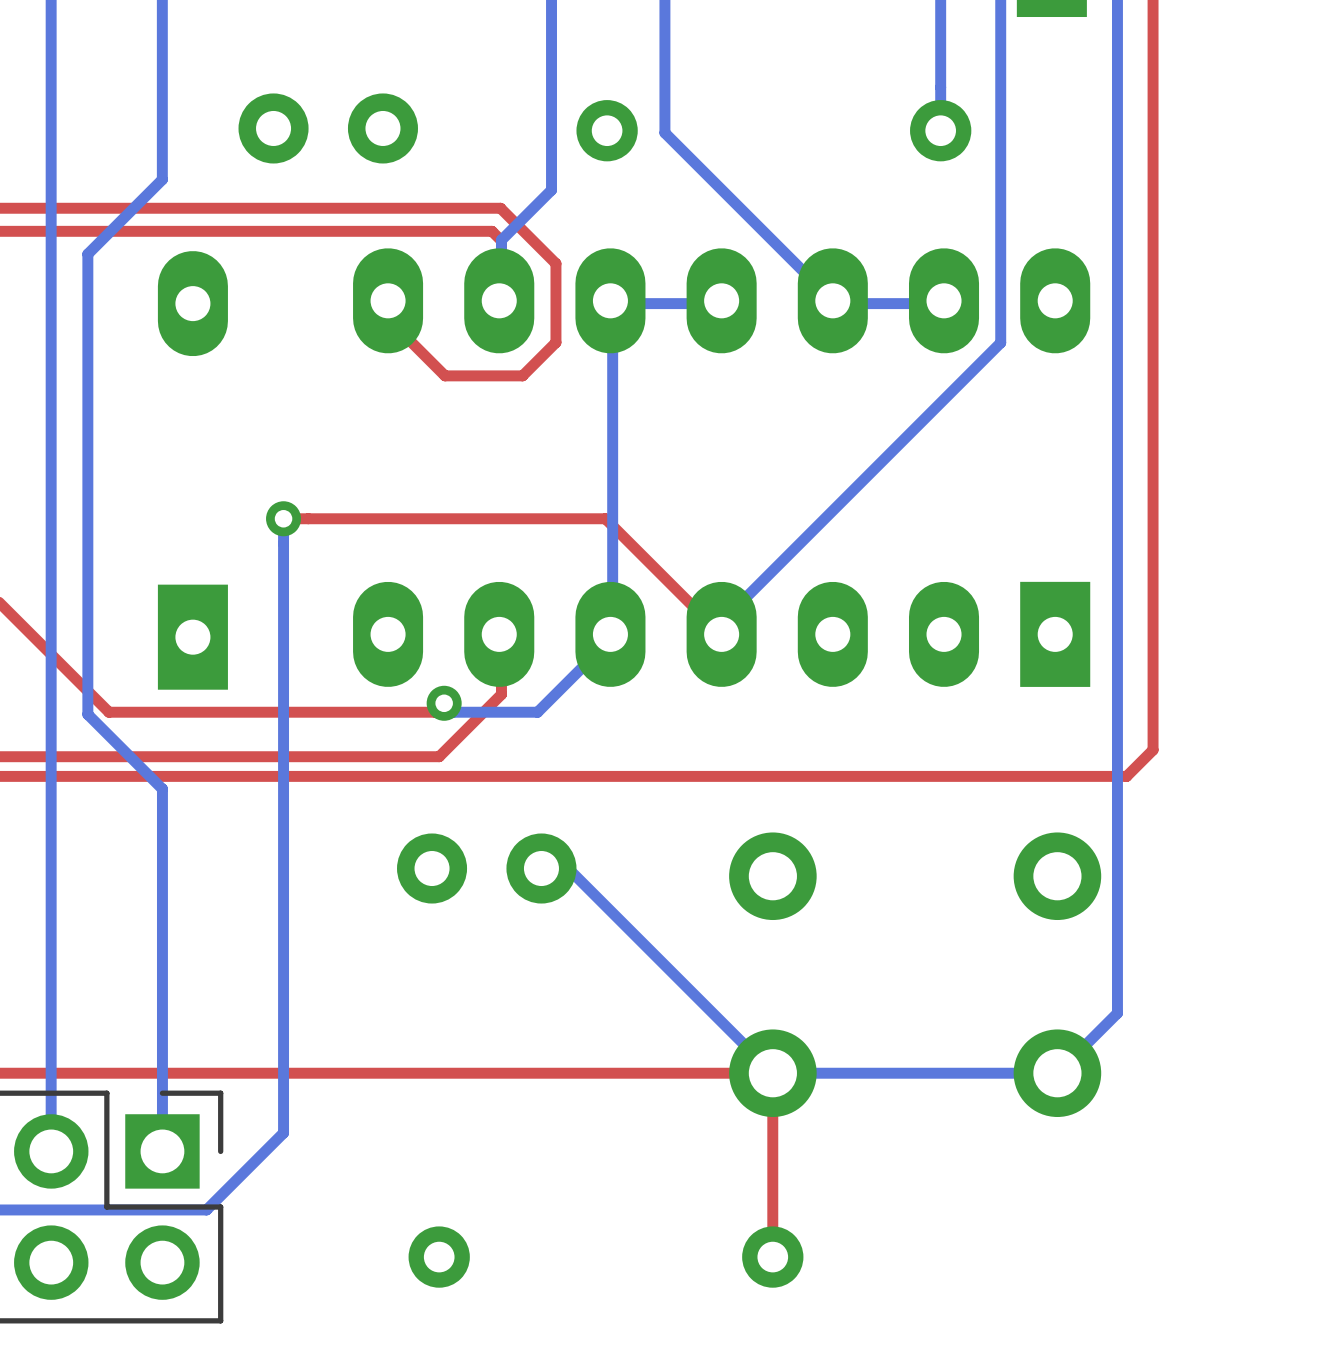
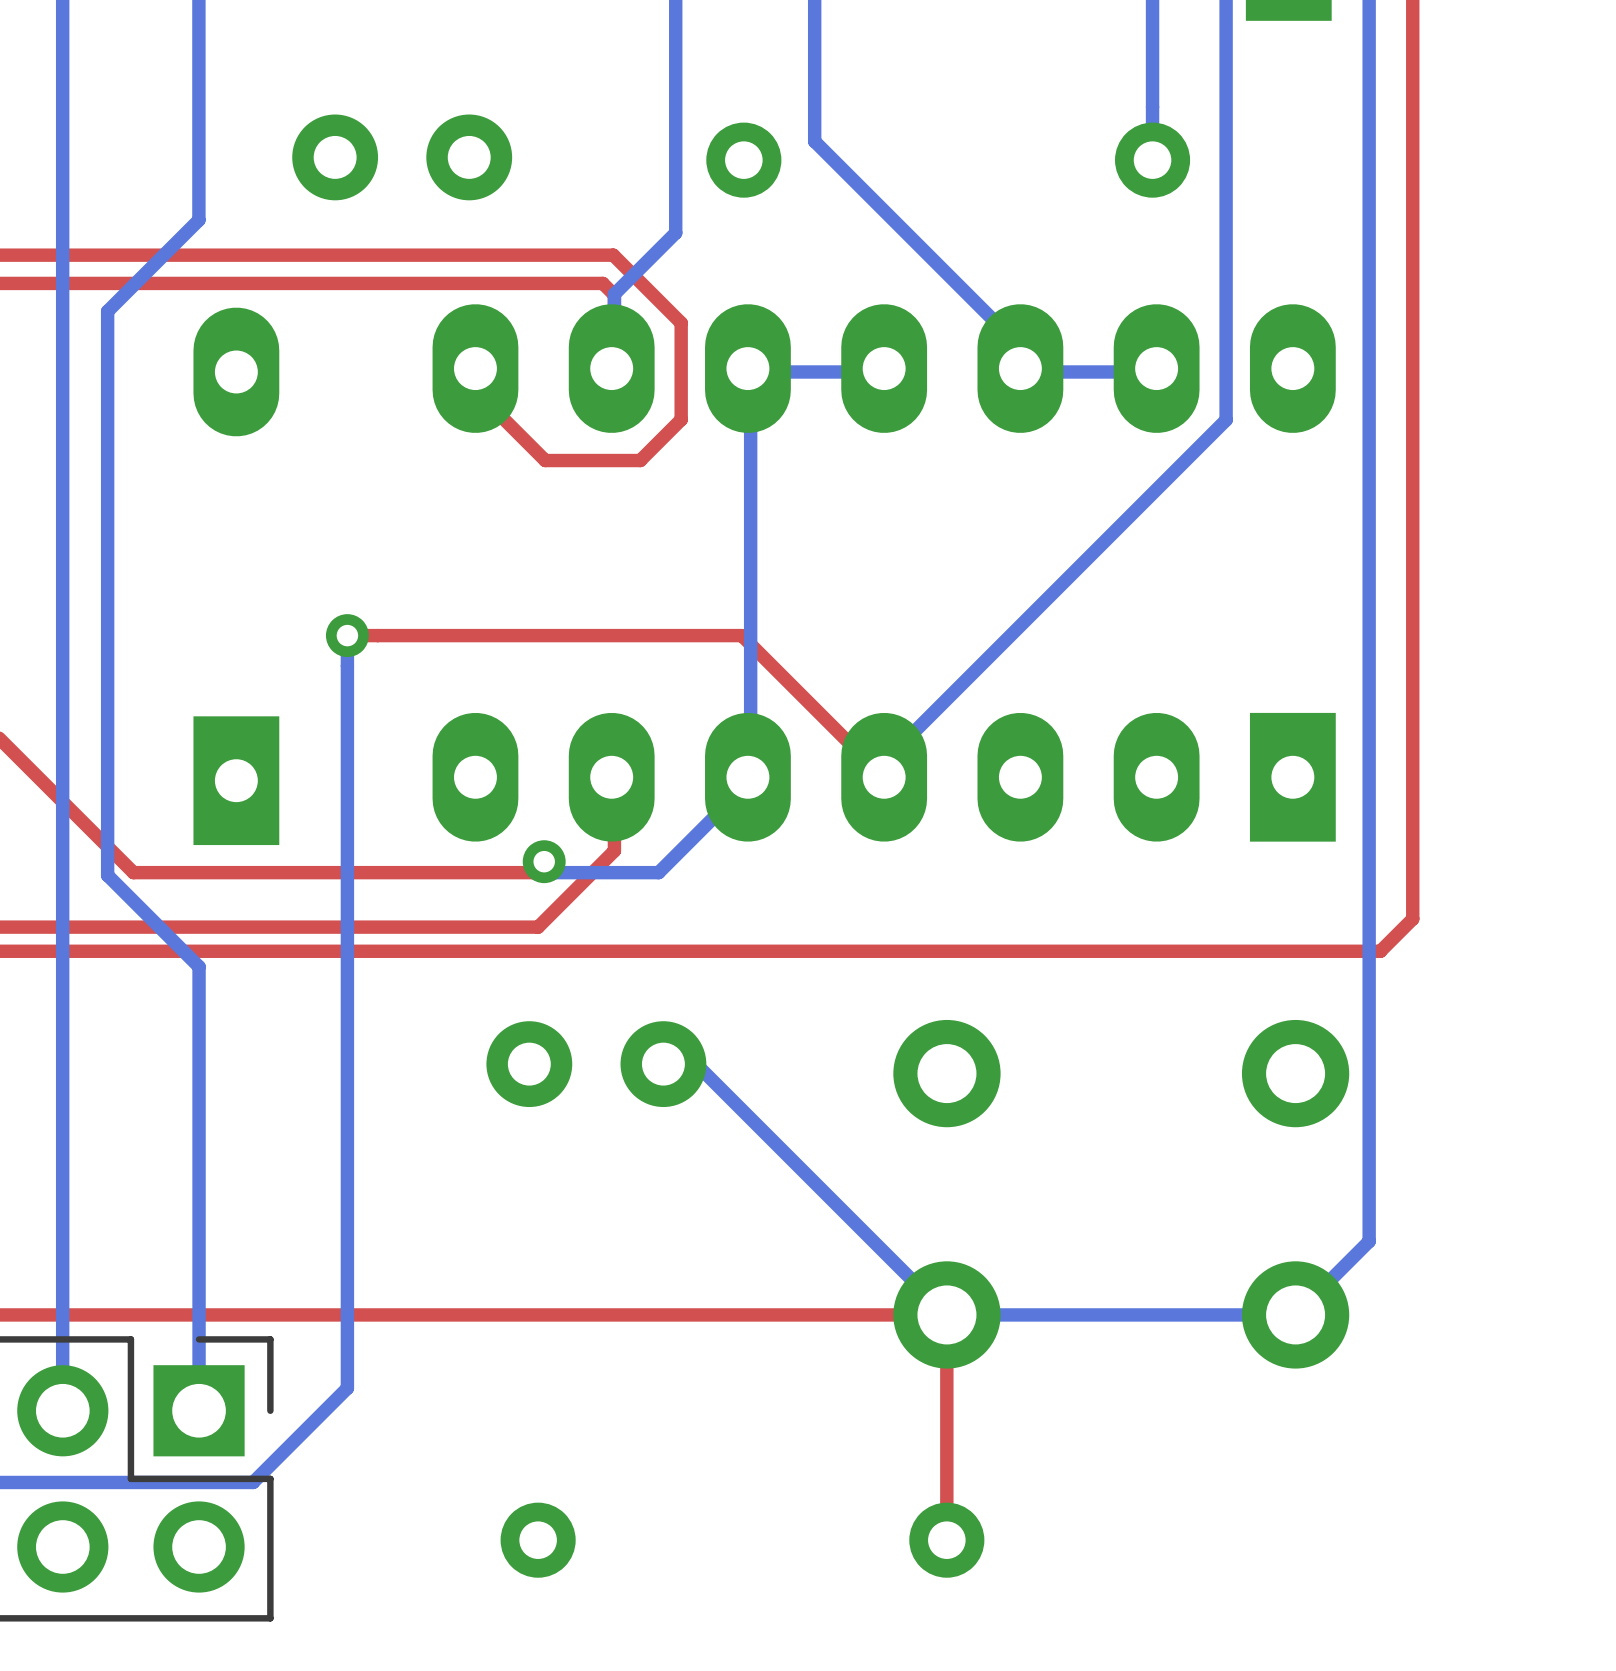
bottom track: (664, 115) (664, 132) (832, 300) -> (814, 141) (1020, 347) (1020, 368)

